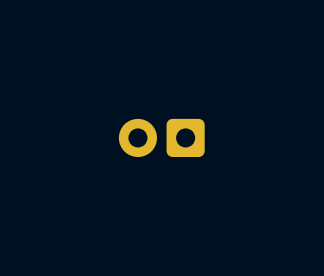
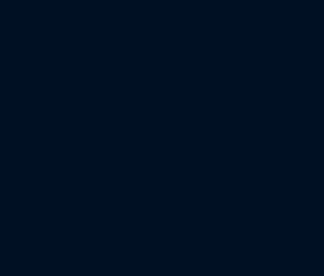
part: (161, 137) -> none

